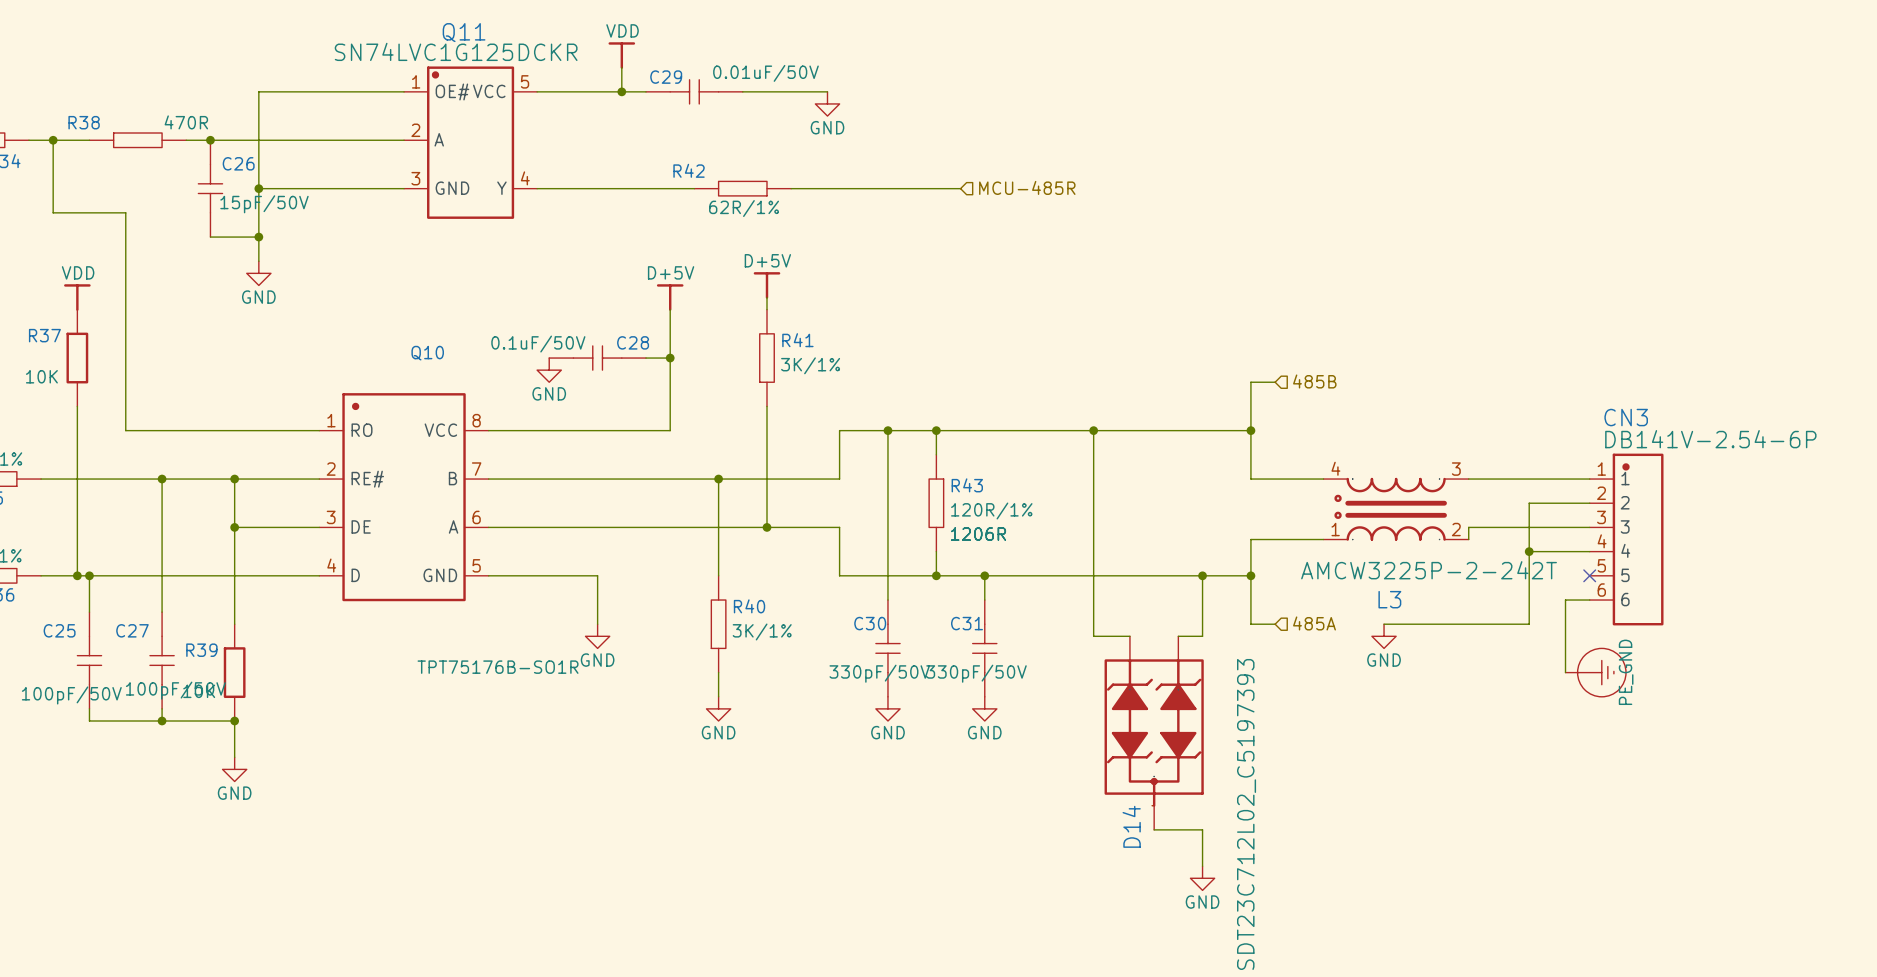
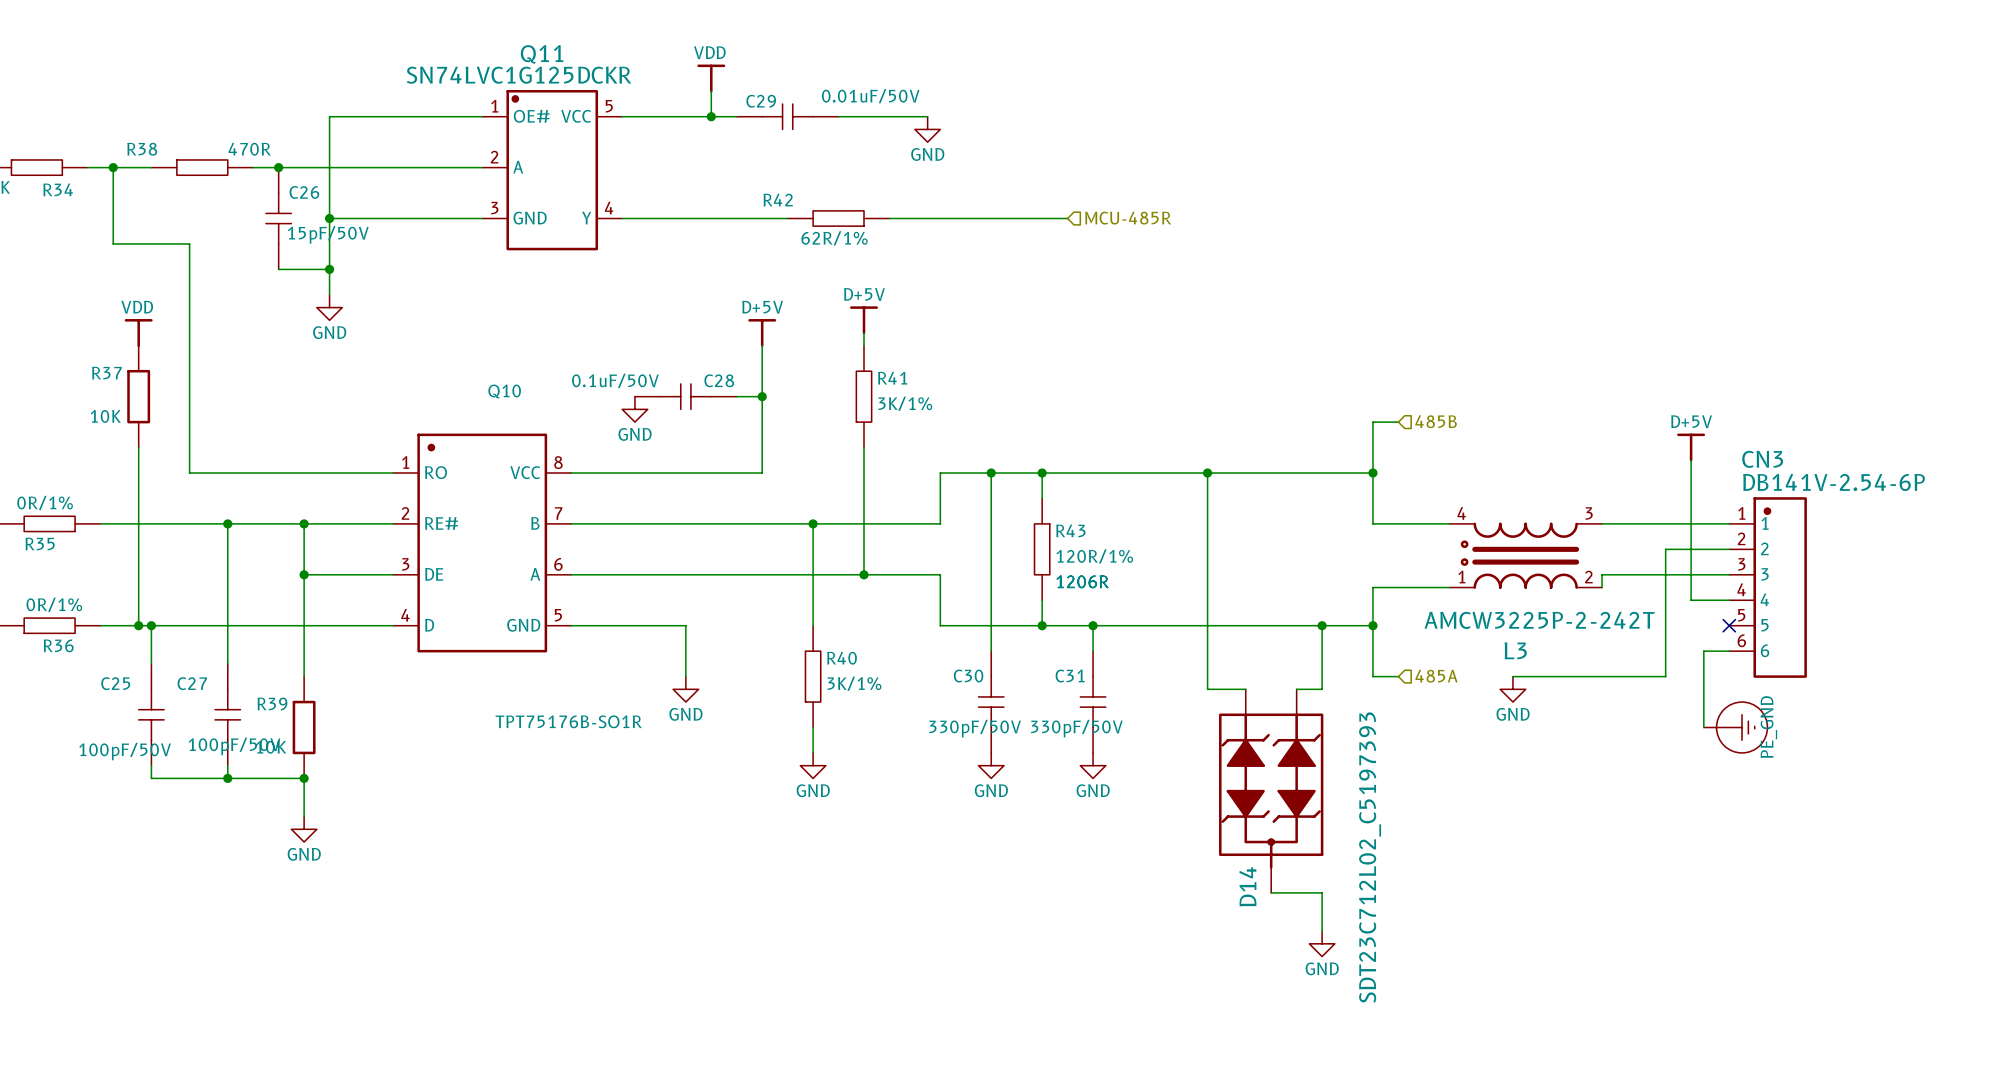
power symbol: none -> D+5V (1691, 447)
wire: (1529, 551) (1553, 551) -> (1691, 460) (1691, 600)
junction: (1529, 551) -> none

